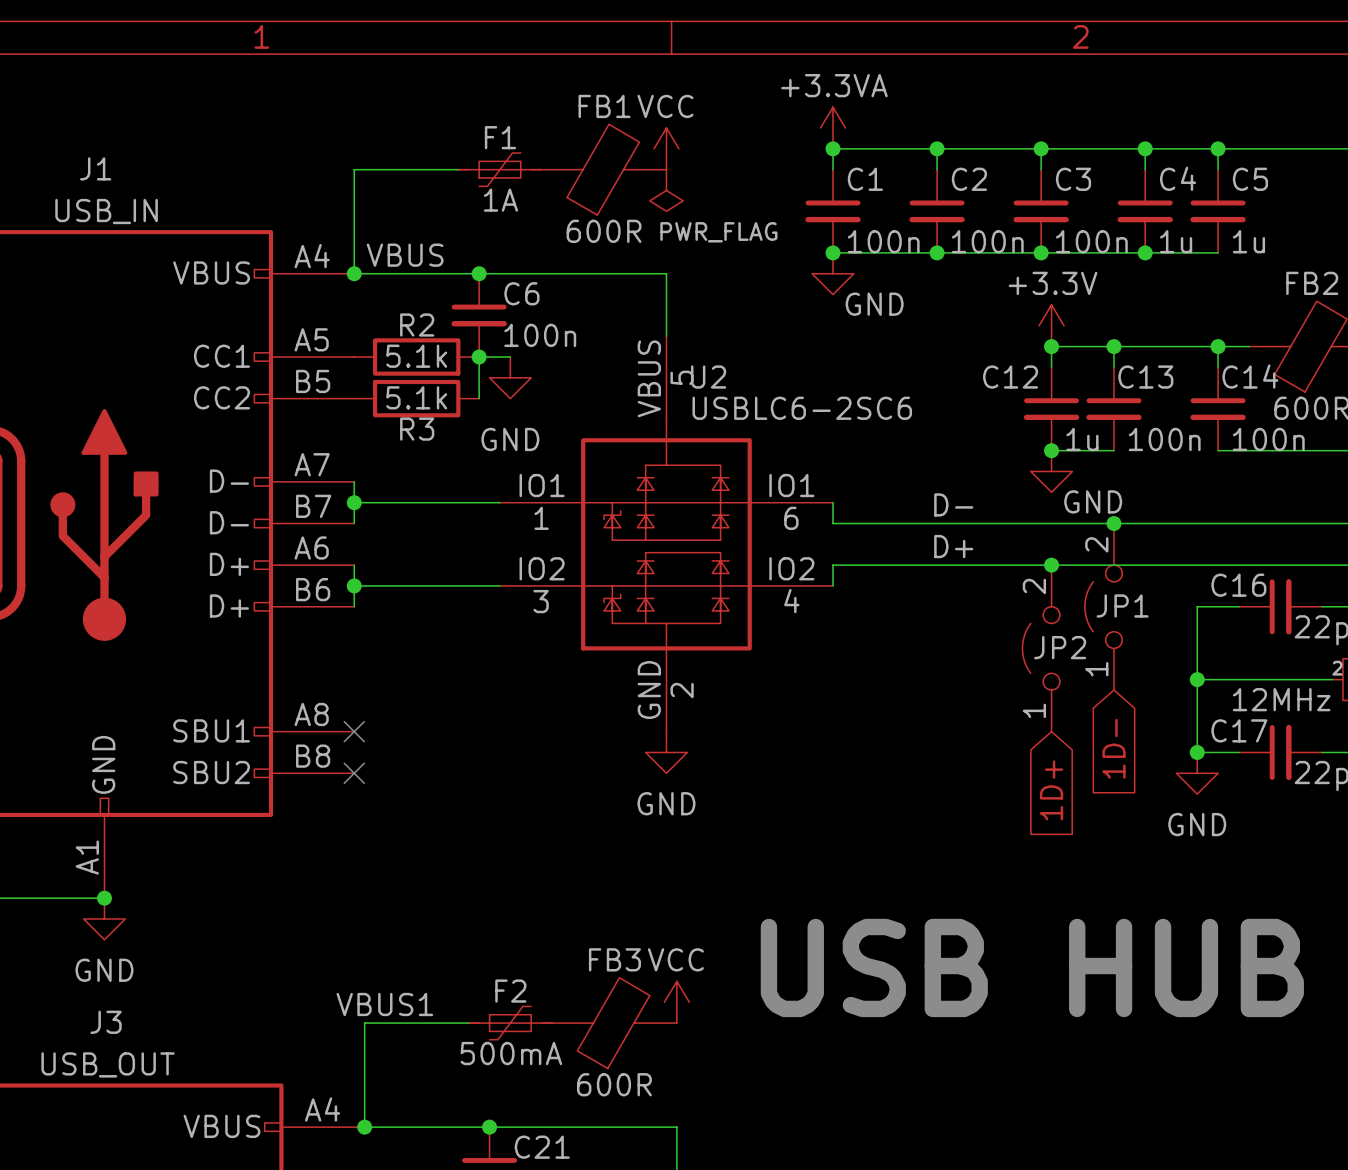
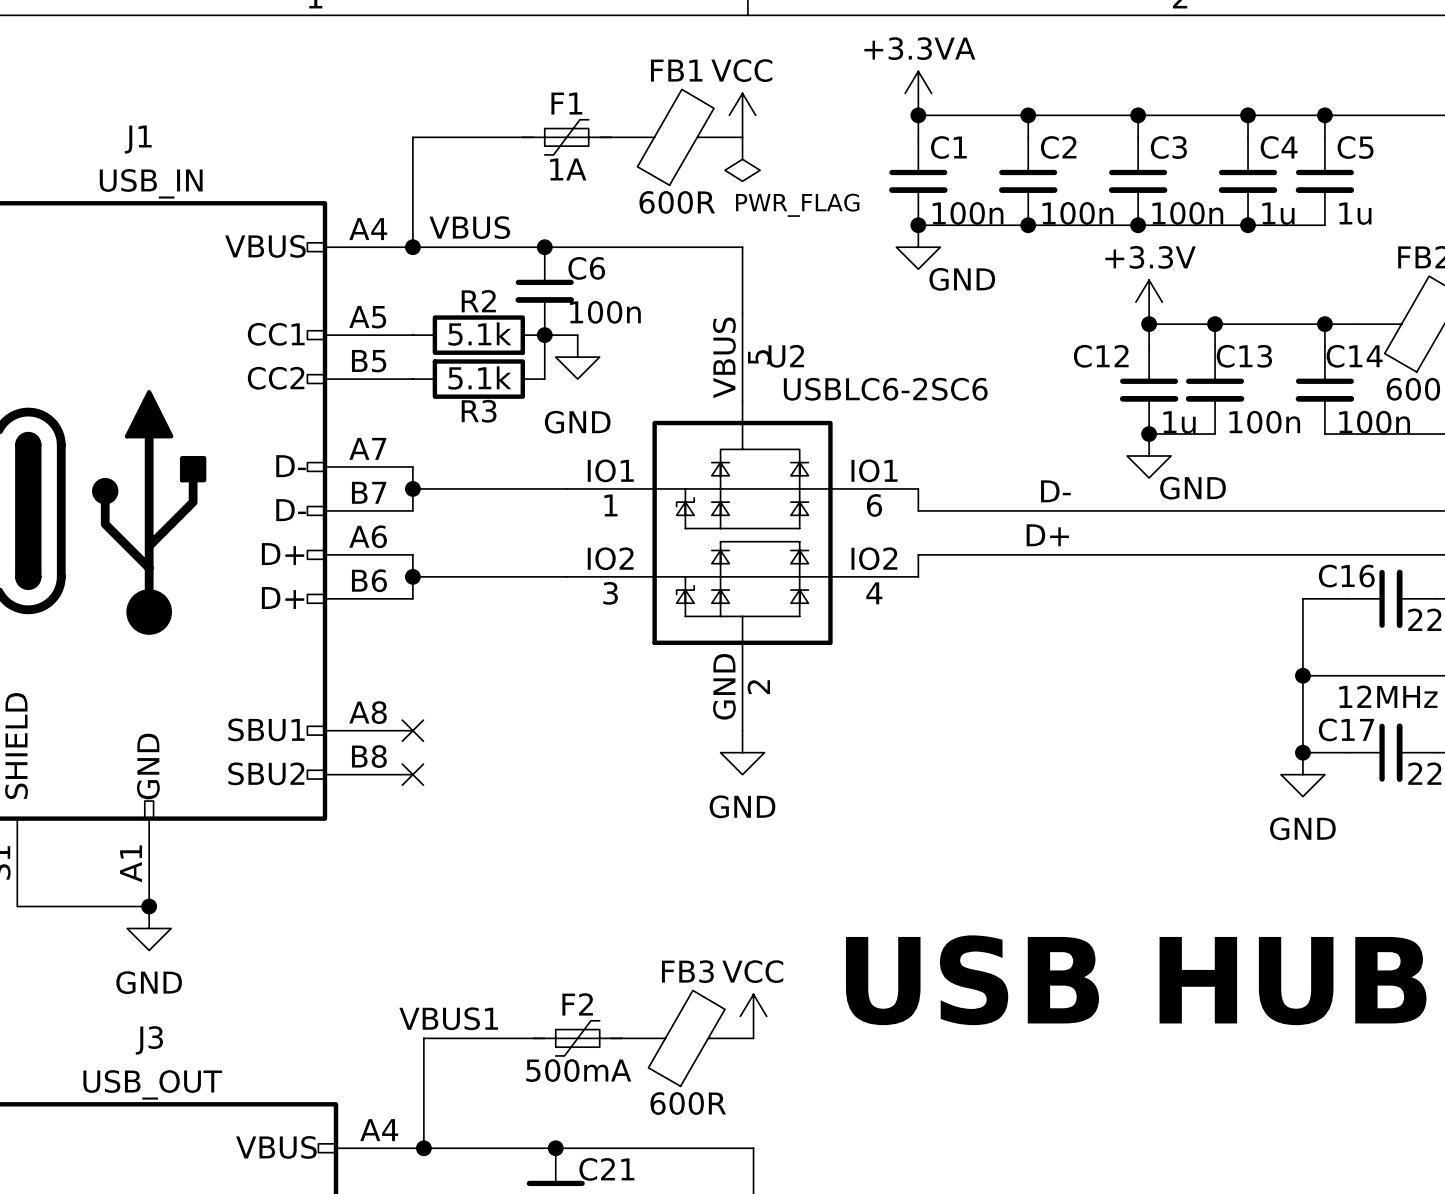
junction: (1113, 523) -> none
junction: (1051, 565) -> none
JP1: (1103, 606) -> none
JP2: (1041, 648) -> none
global label: 1D- (1113, 748) -> none
global label: 1D+ (1051, 790) -> none

